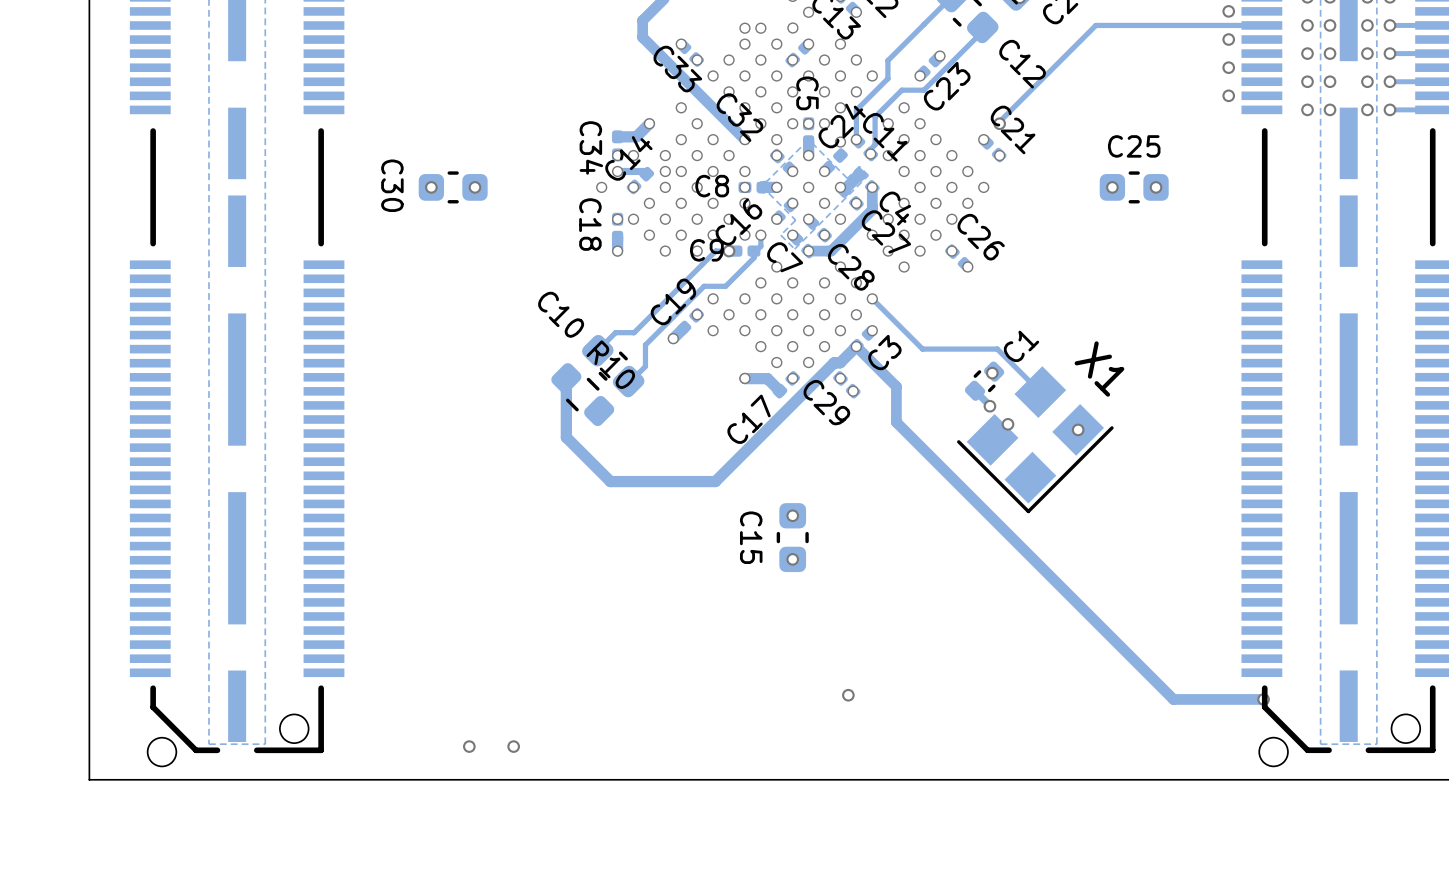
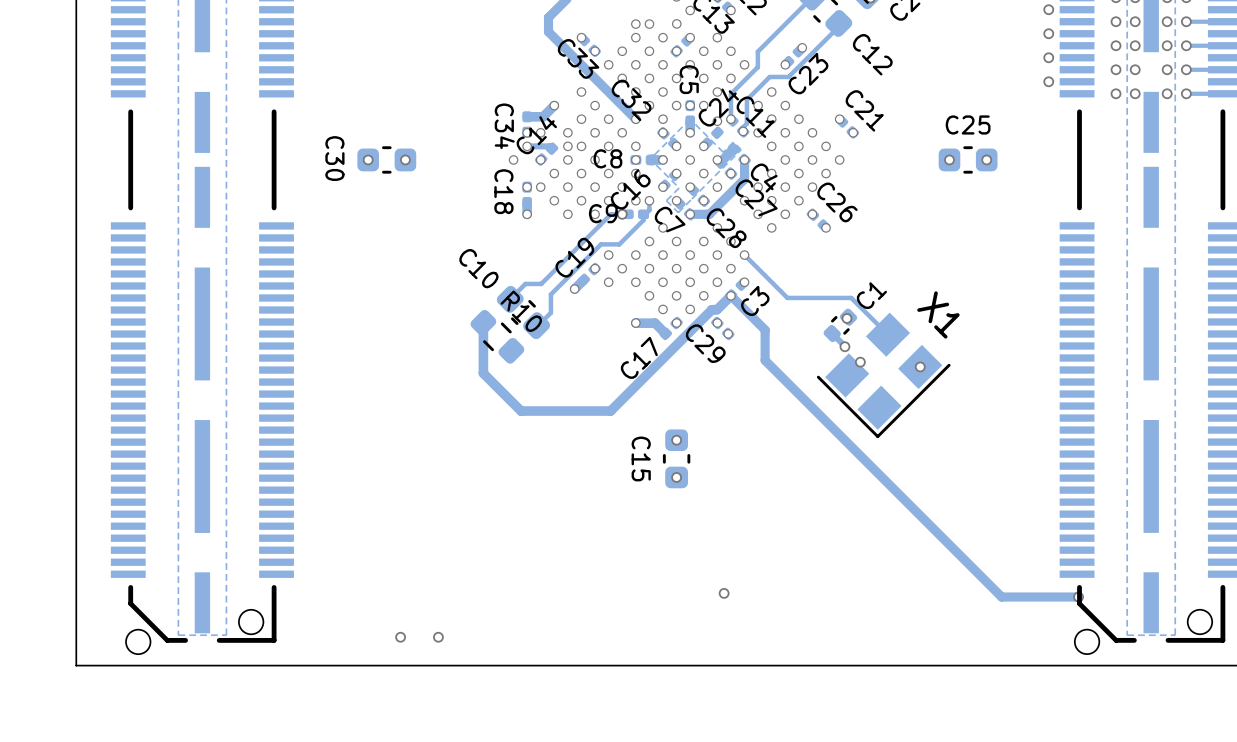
track: (1261, 25) (1095, 25) (999, 123) -> none
via: (999, 123) -> none

